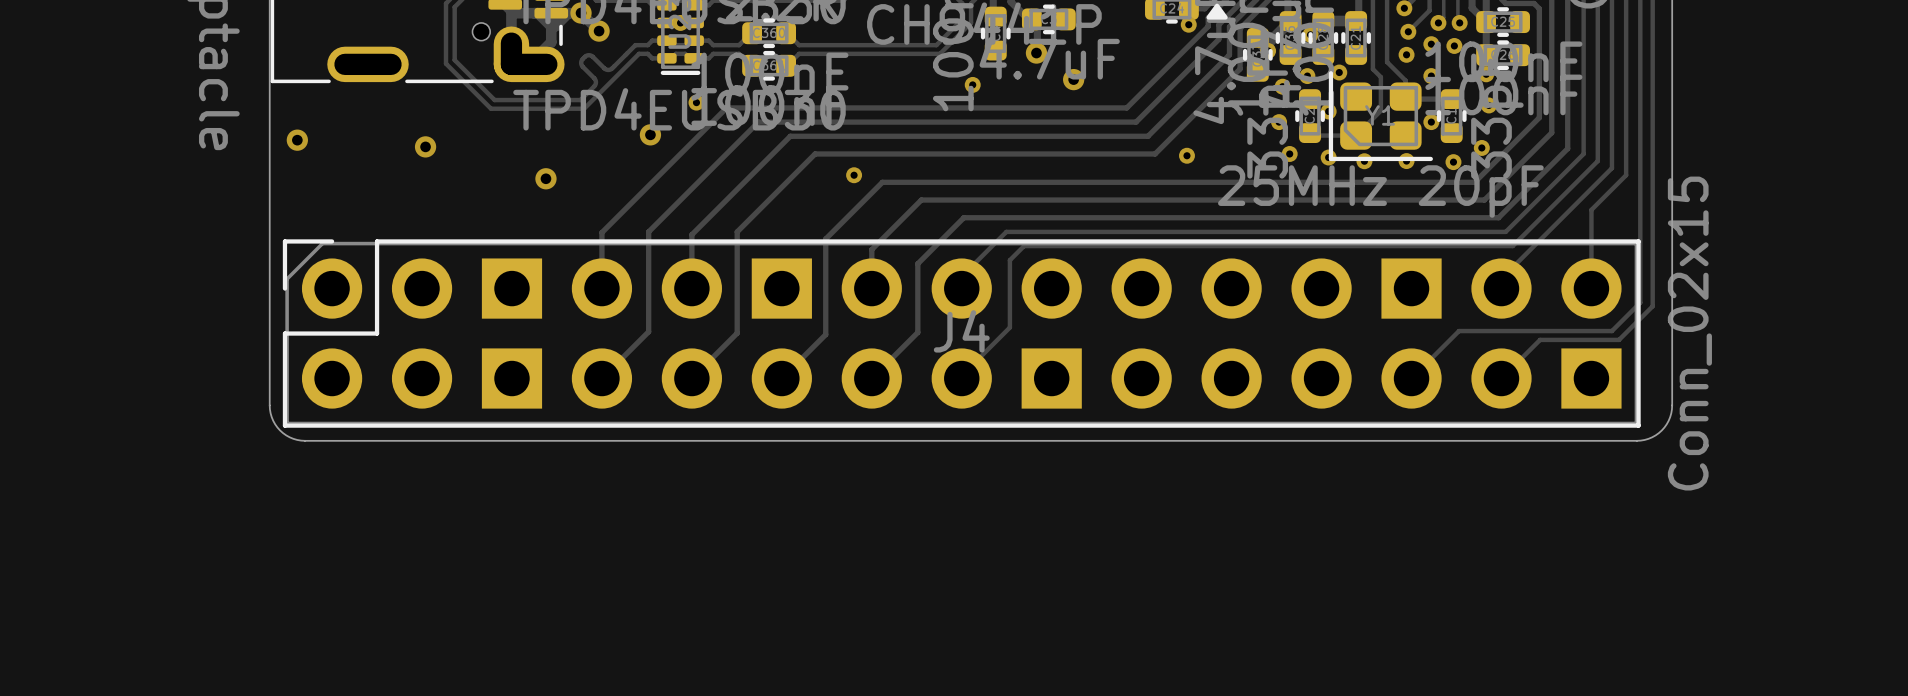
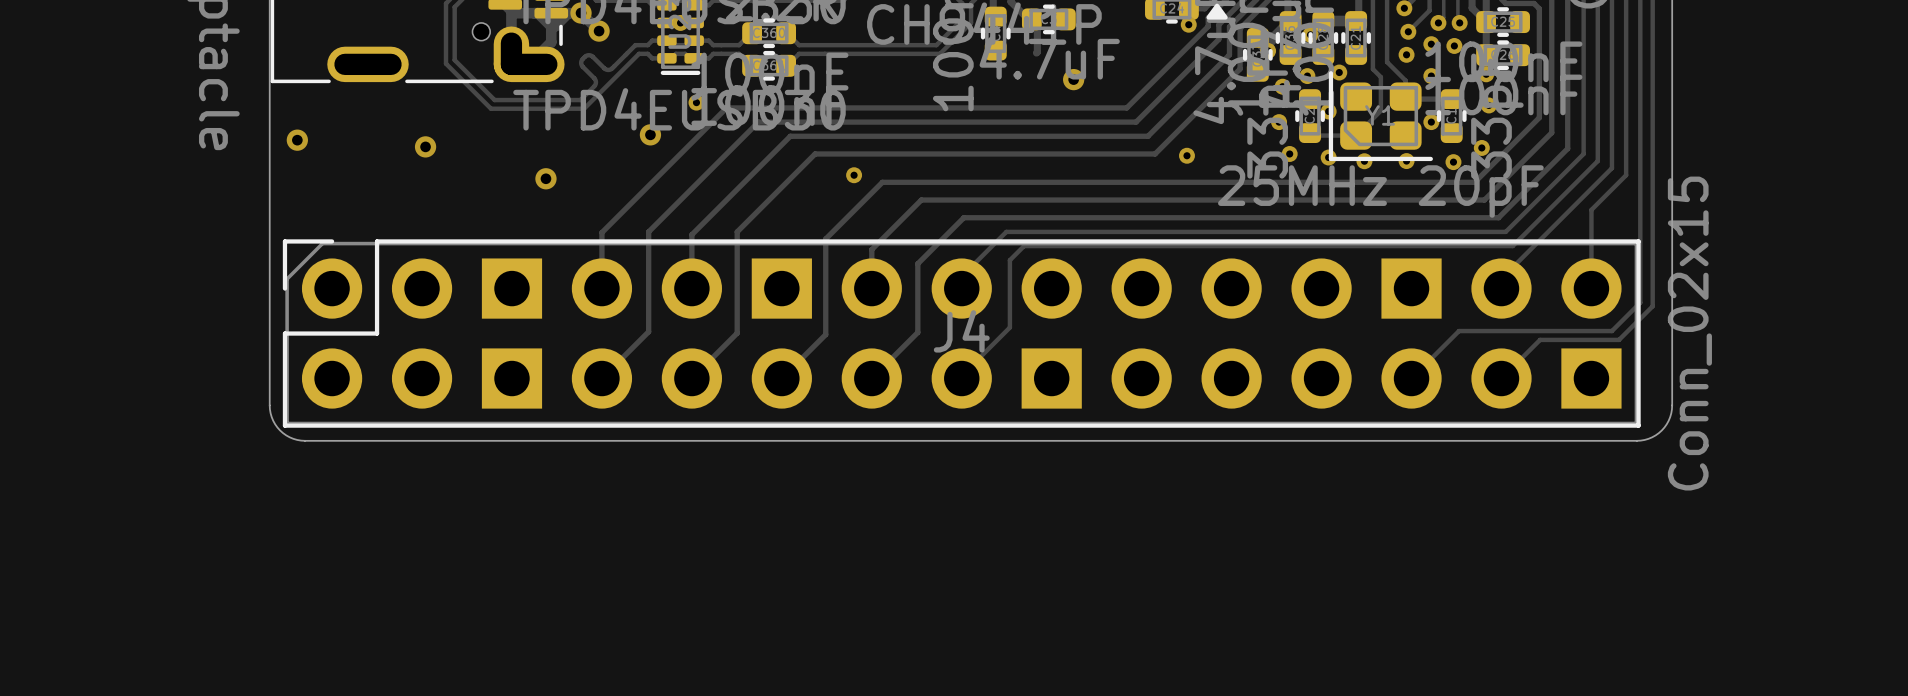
via: (1036, 53) -> none
via: (972, 84) -> none

